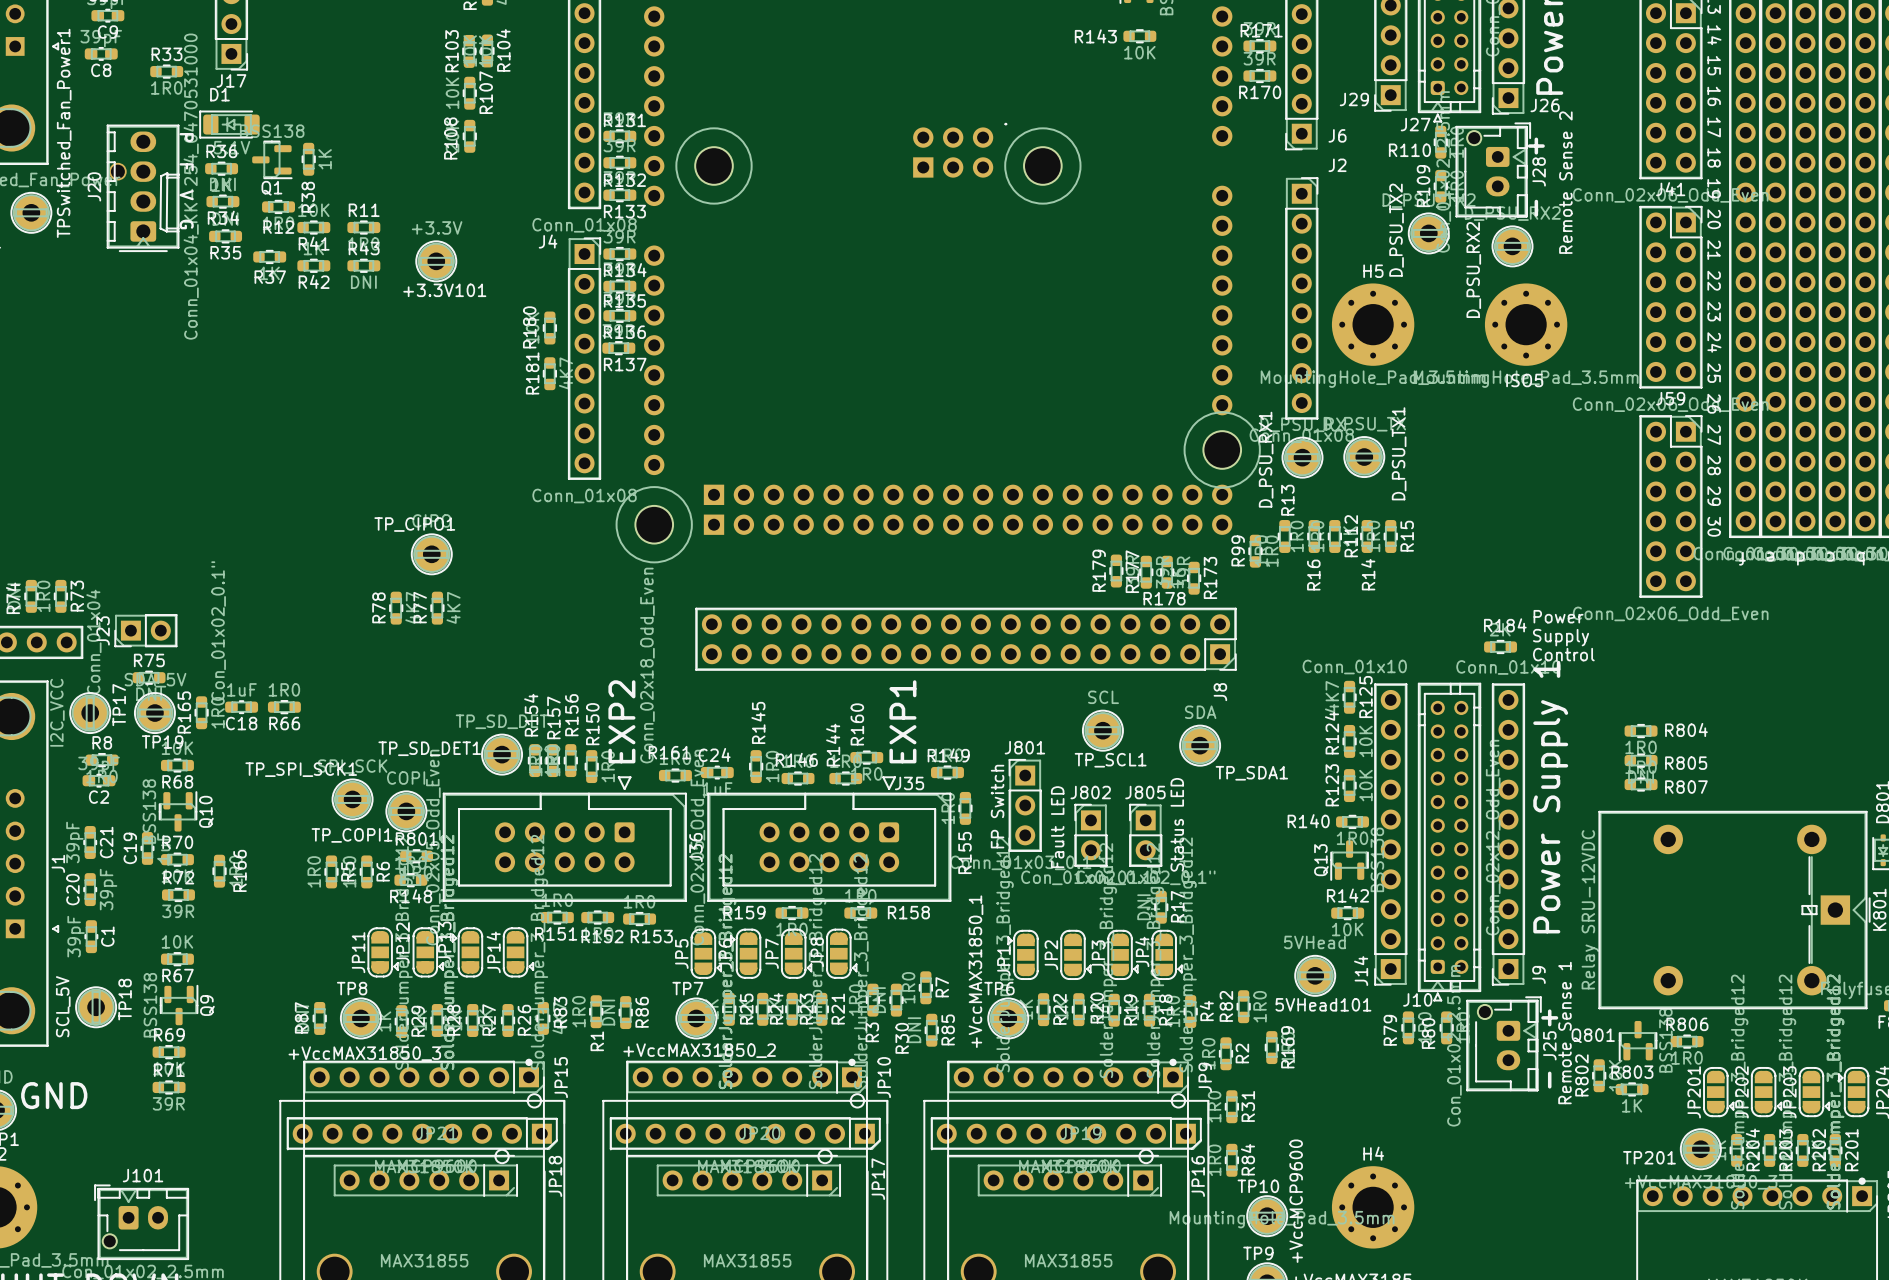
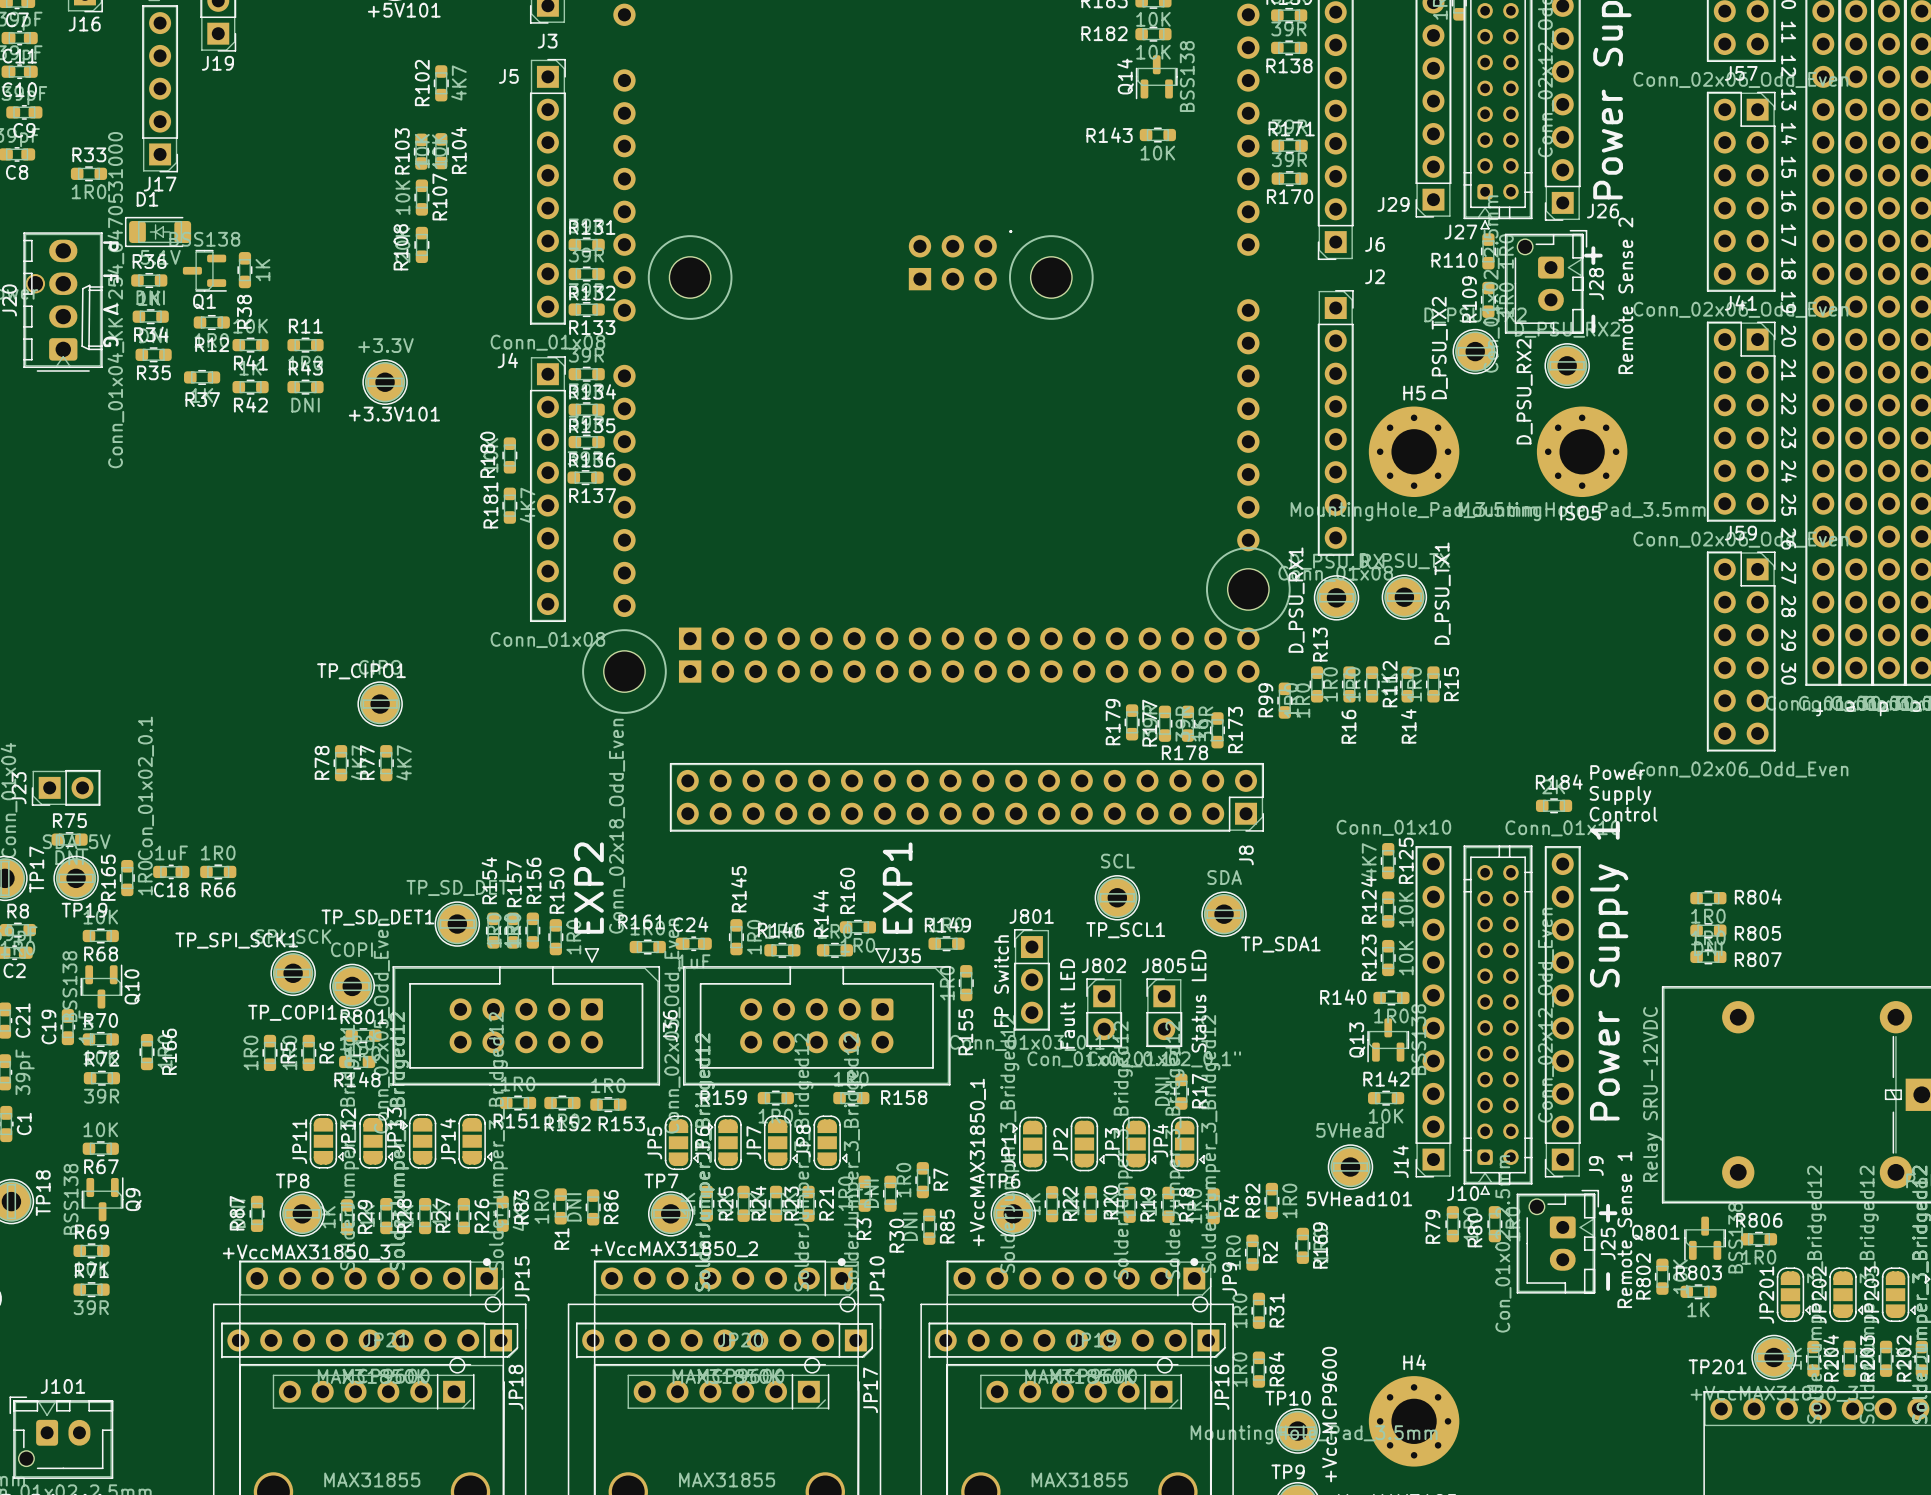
J23 value: Con_01x02_0.1" (218, 631) -> Con_01x02_0.1 (145, 788)

